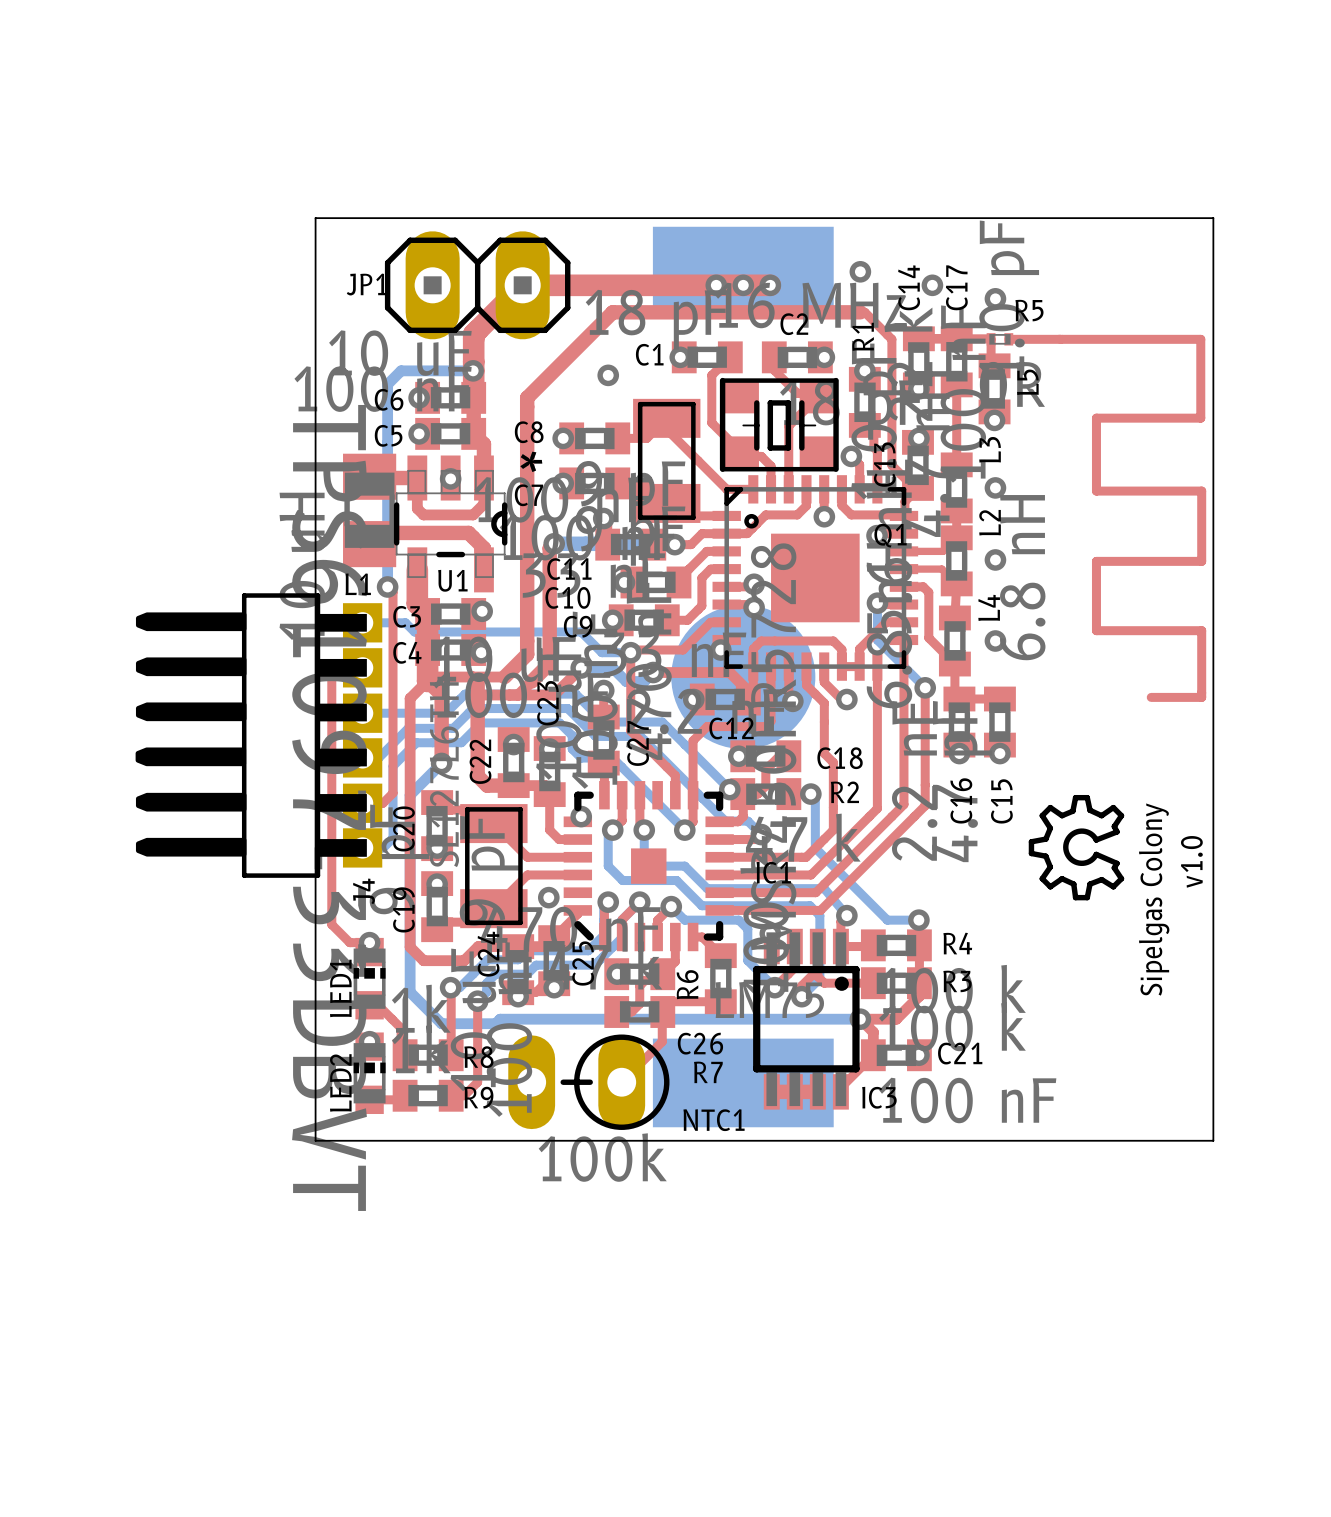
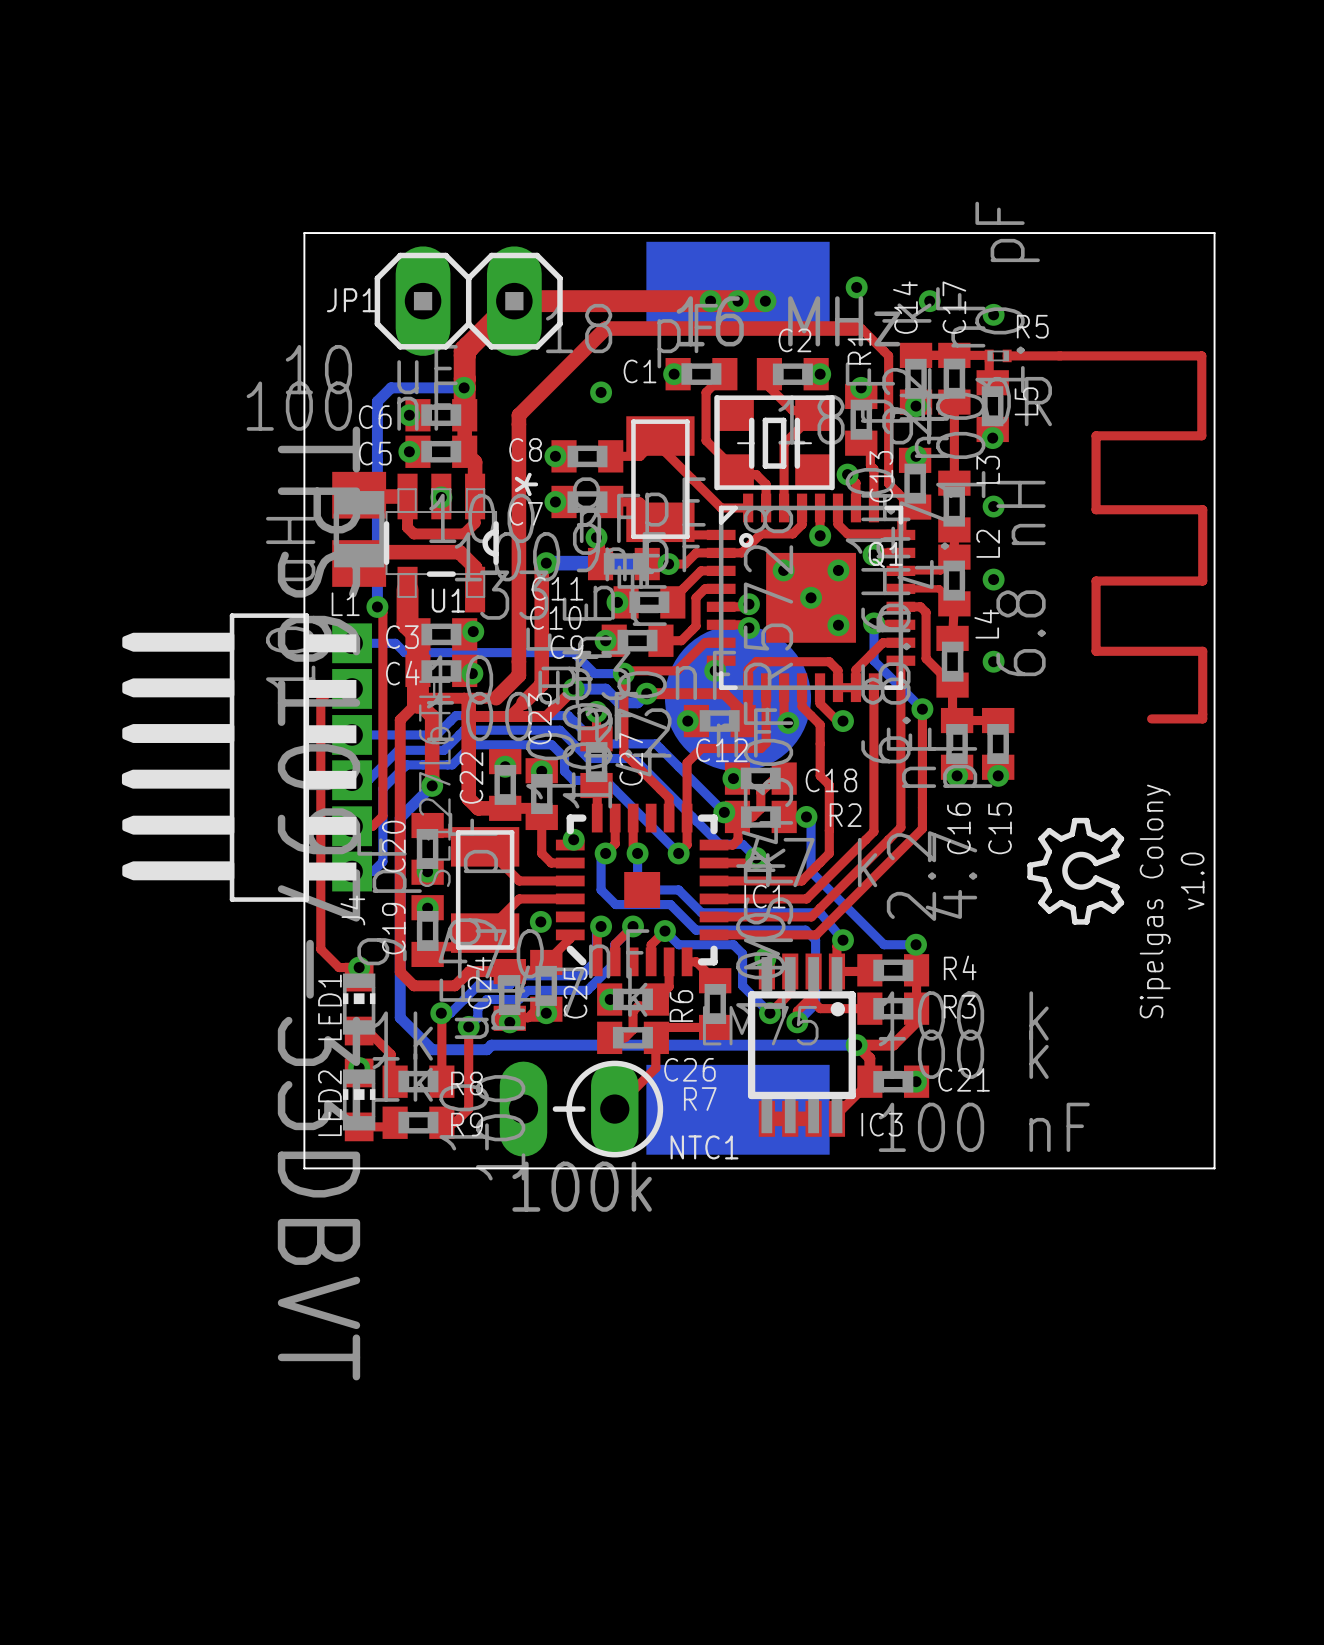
via: none -> (783, 570)
via: none -> (838, 570)
via: none -> (811, 597)
via: none -> (838, 625)

